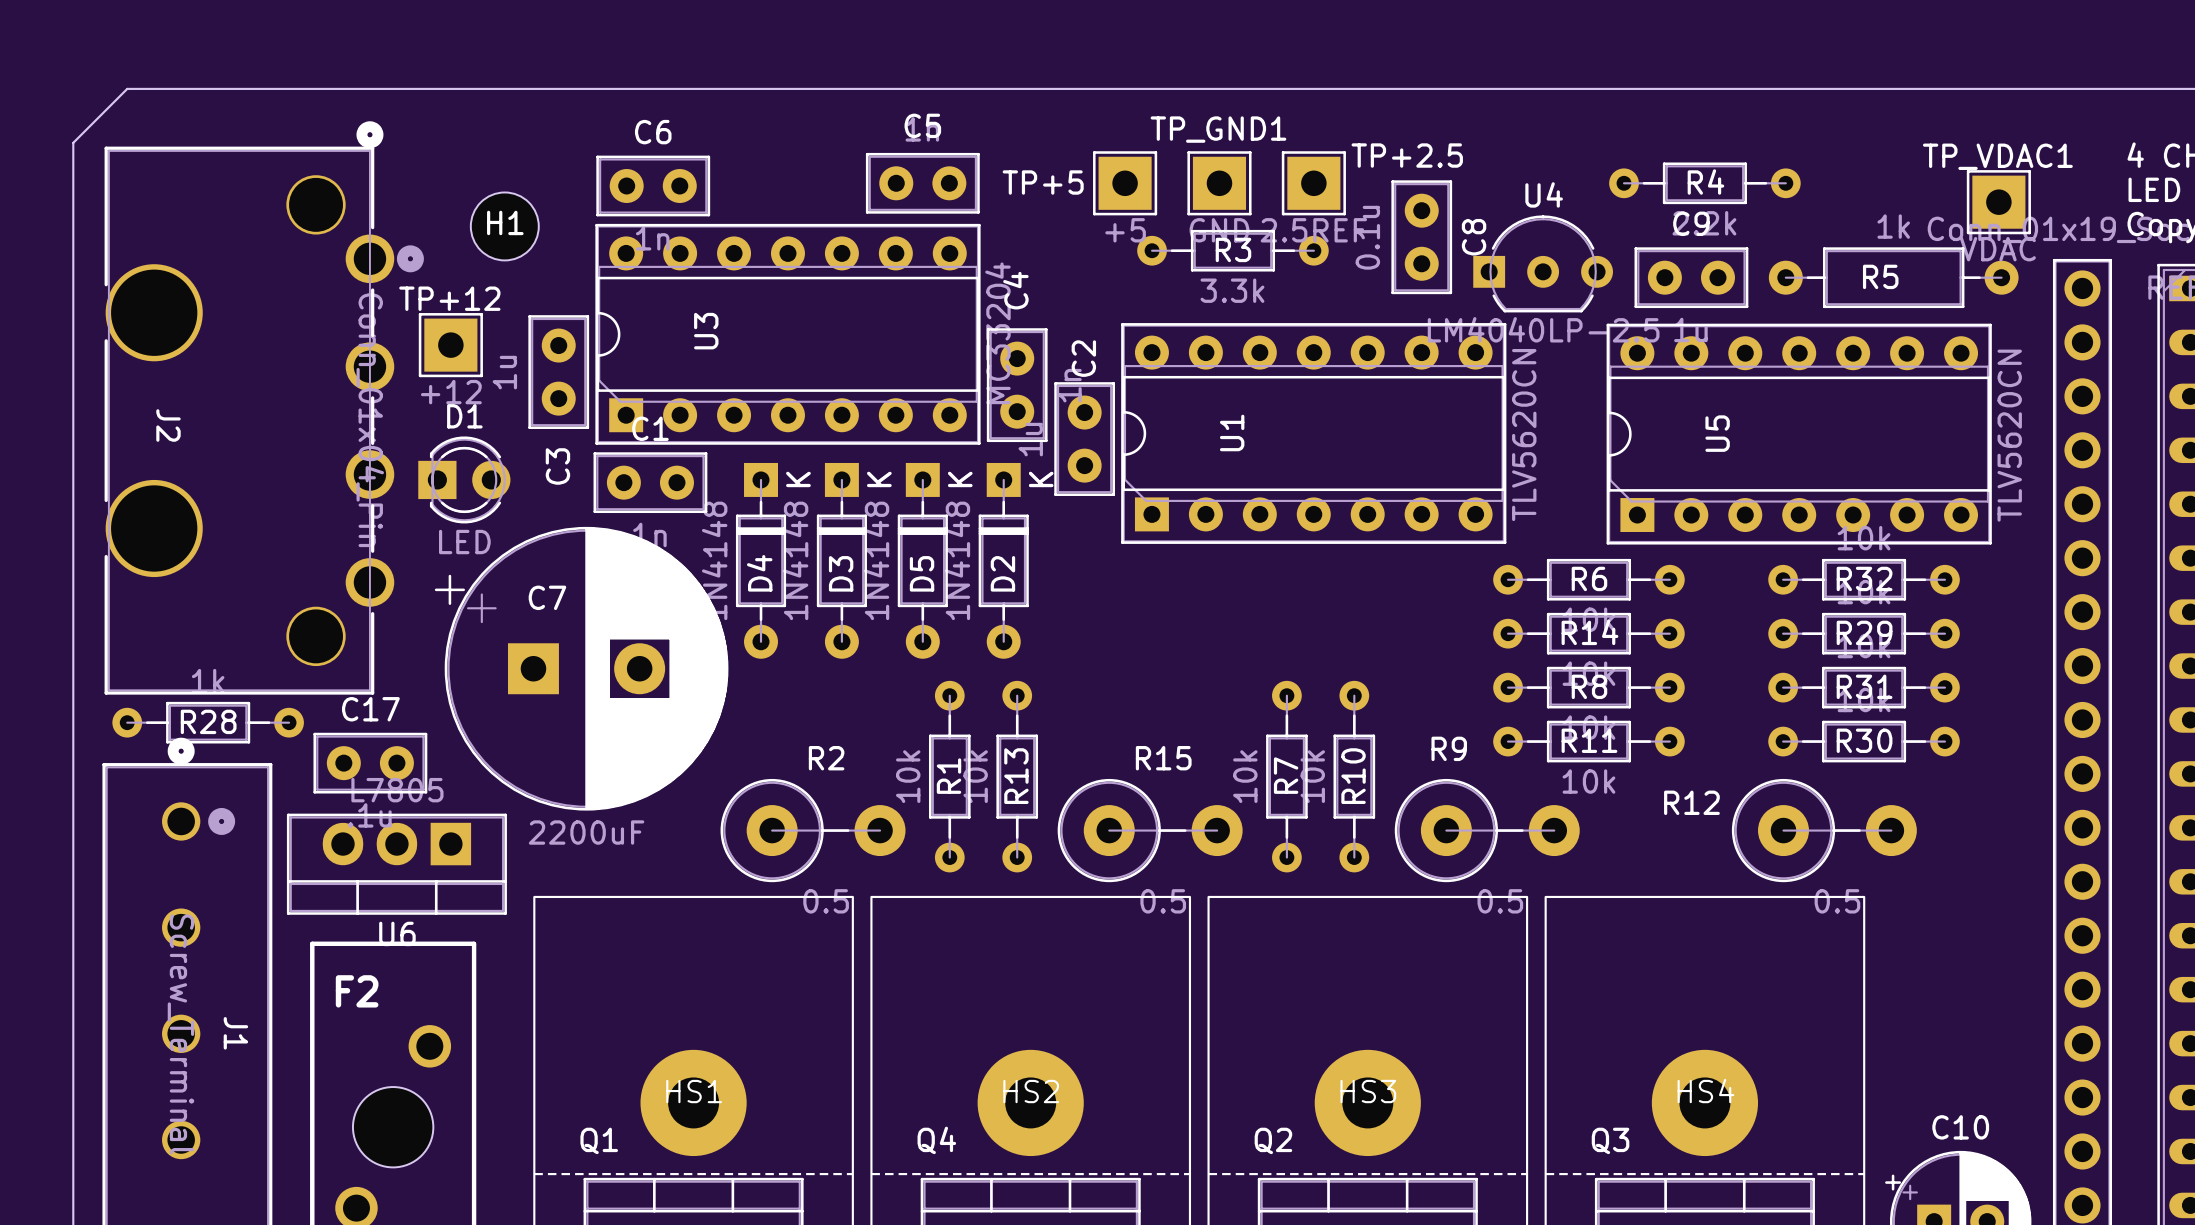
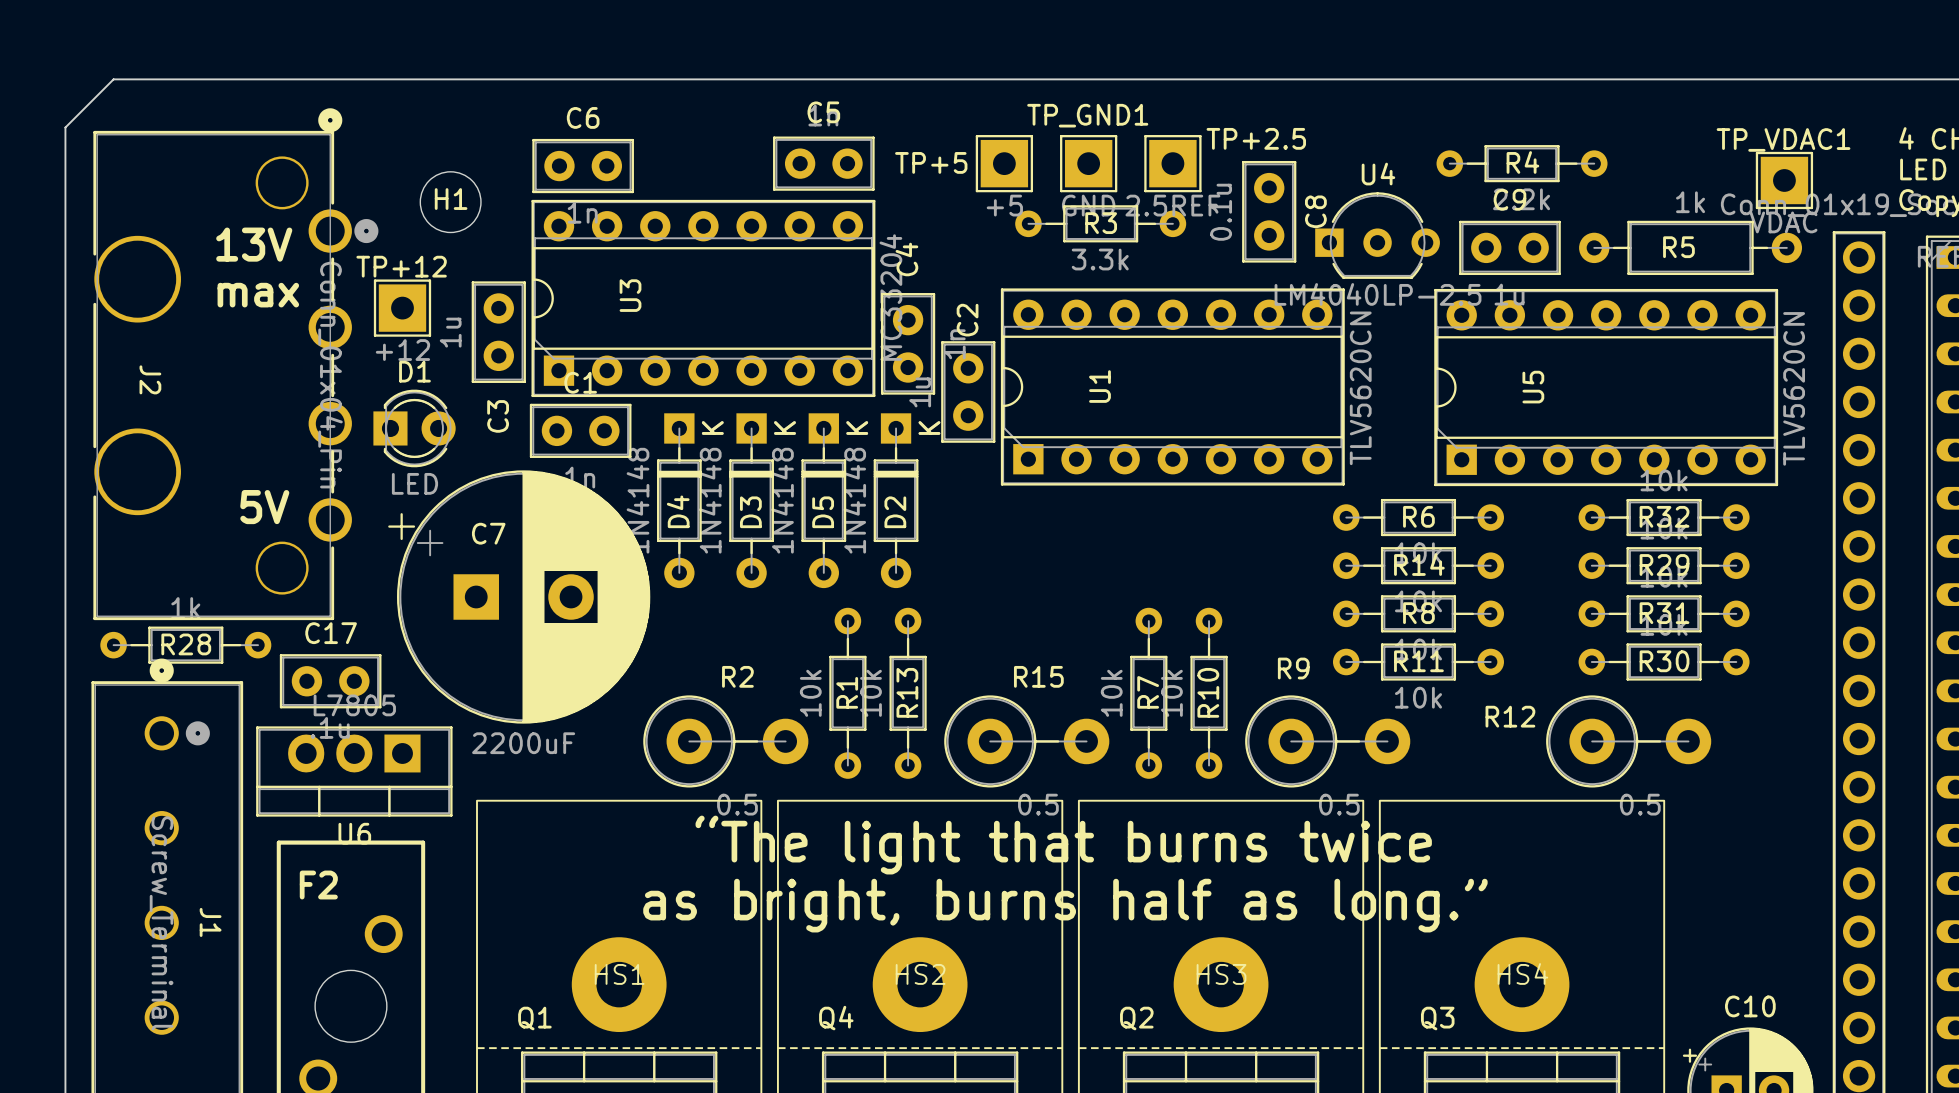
text: none -> 13V (254, 244)
text: none -> max (258, 295)
text: none -> 5V (264, 507)
text: none -> “The light that burns twice (1063, 845)
text: none -> as bright, burns half as long.” (1065, 905)

